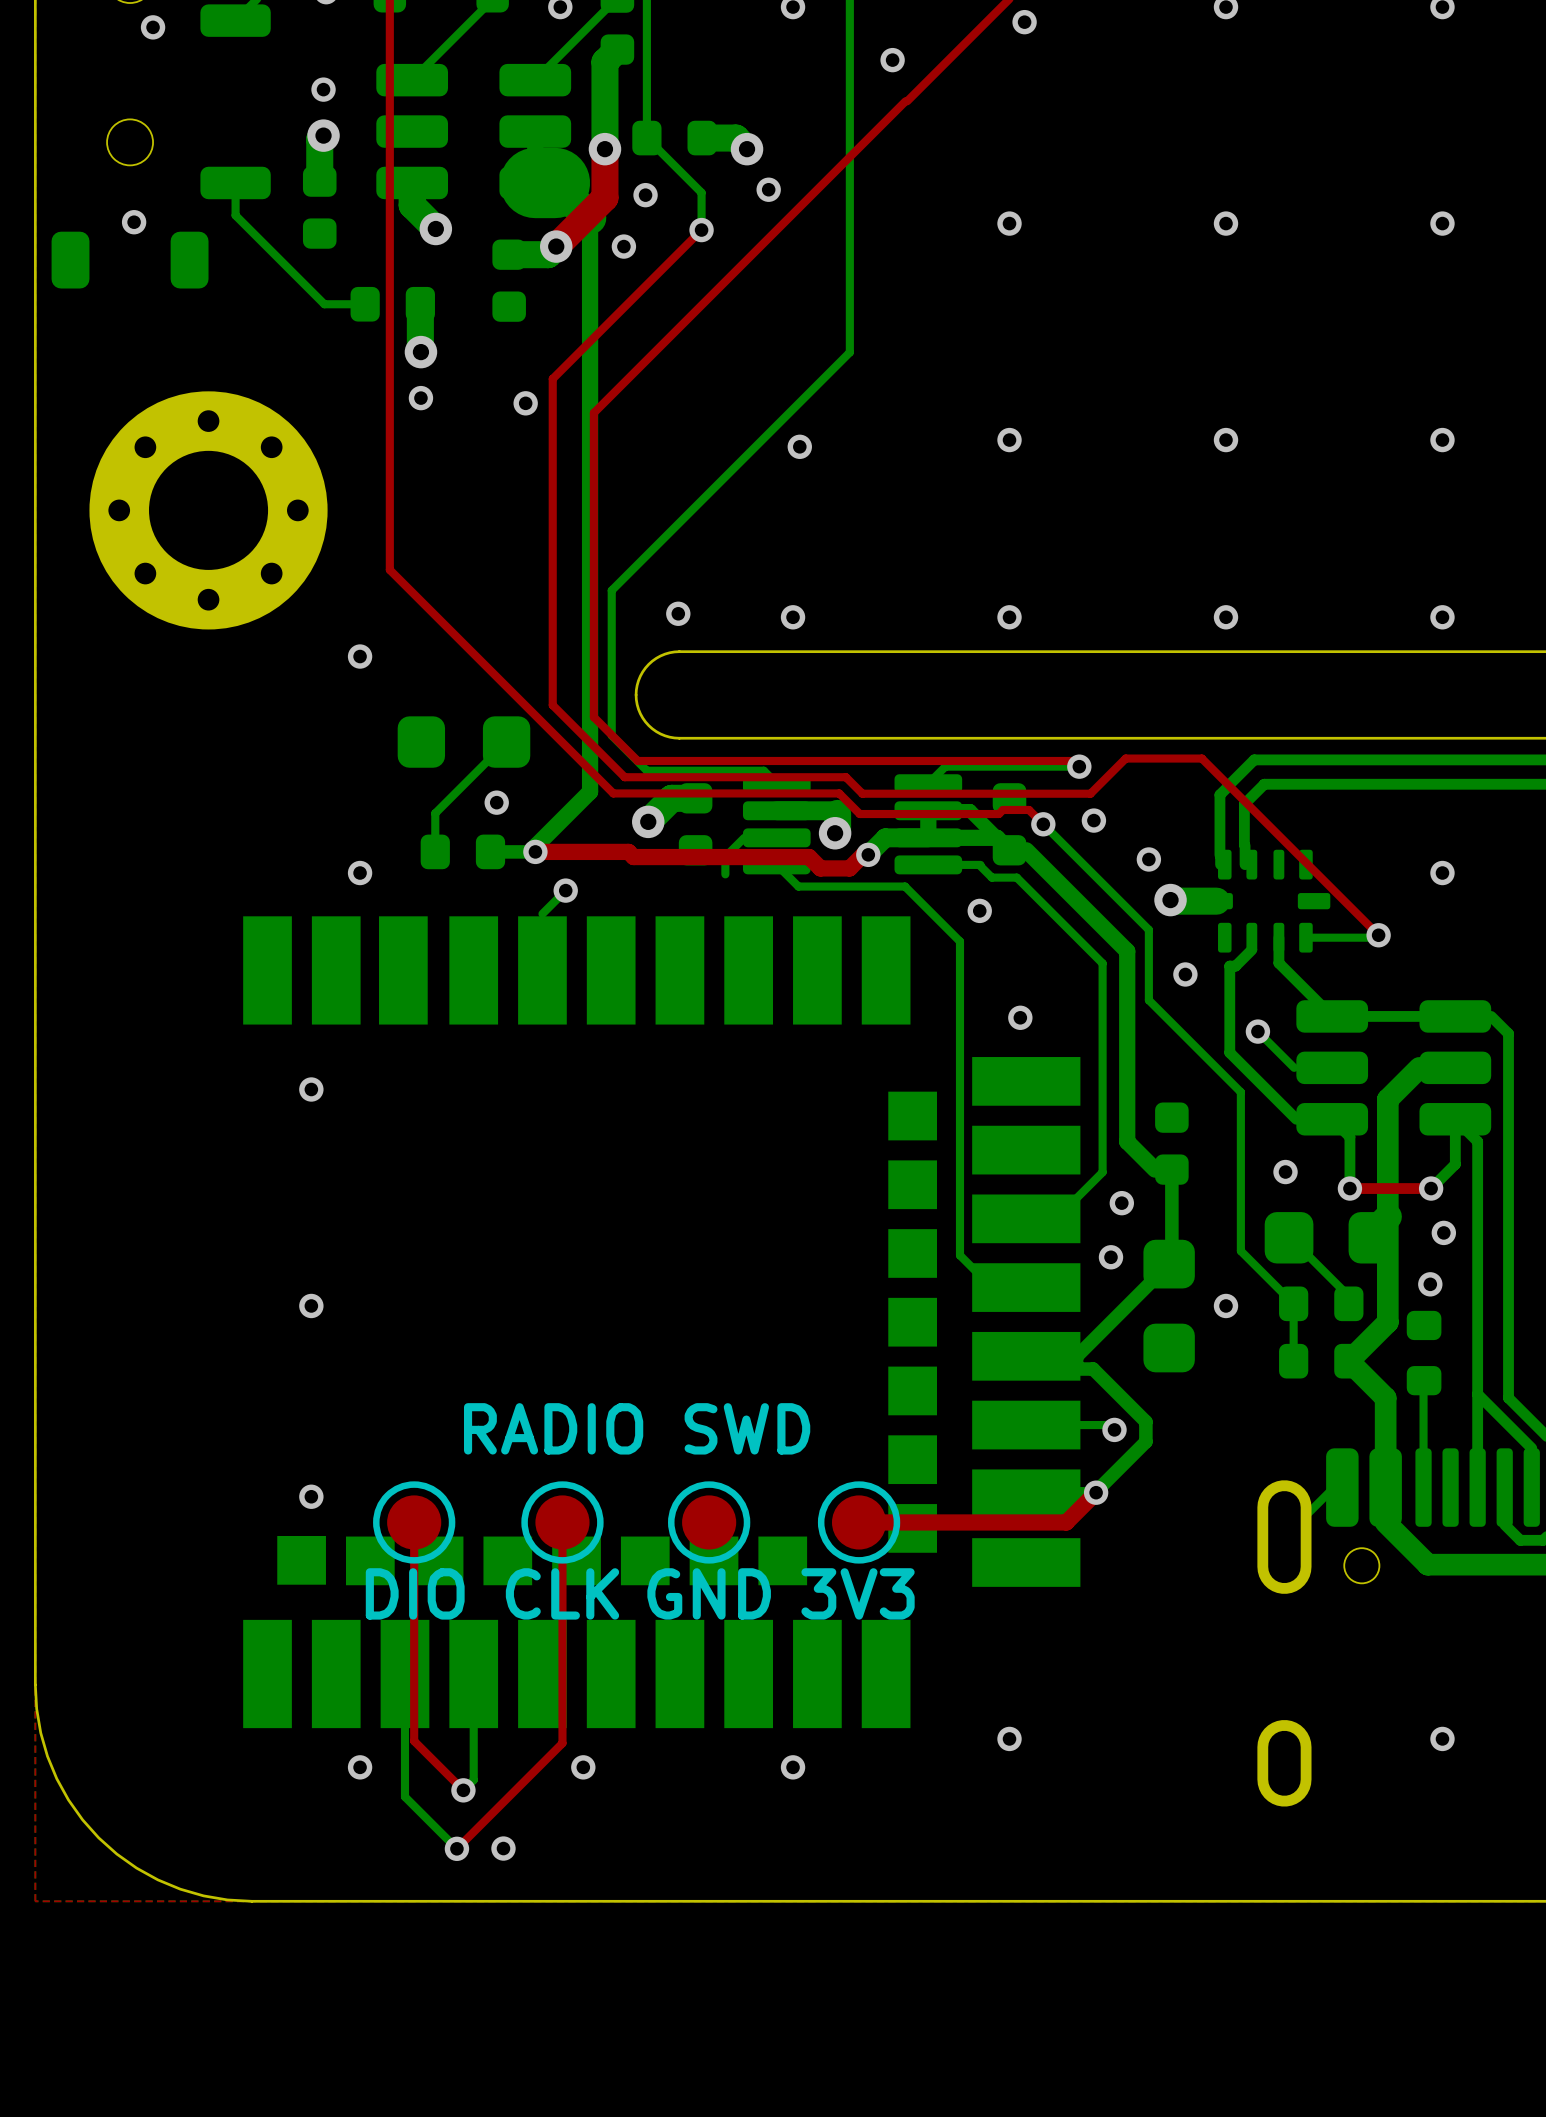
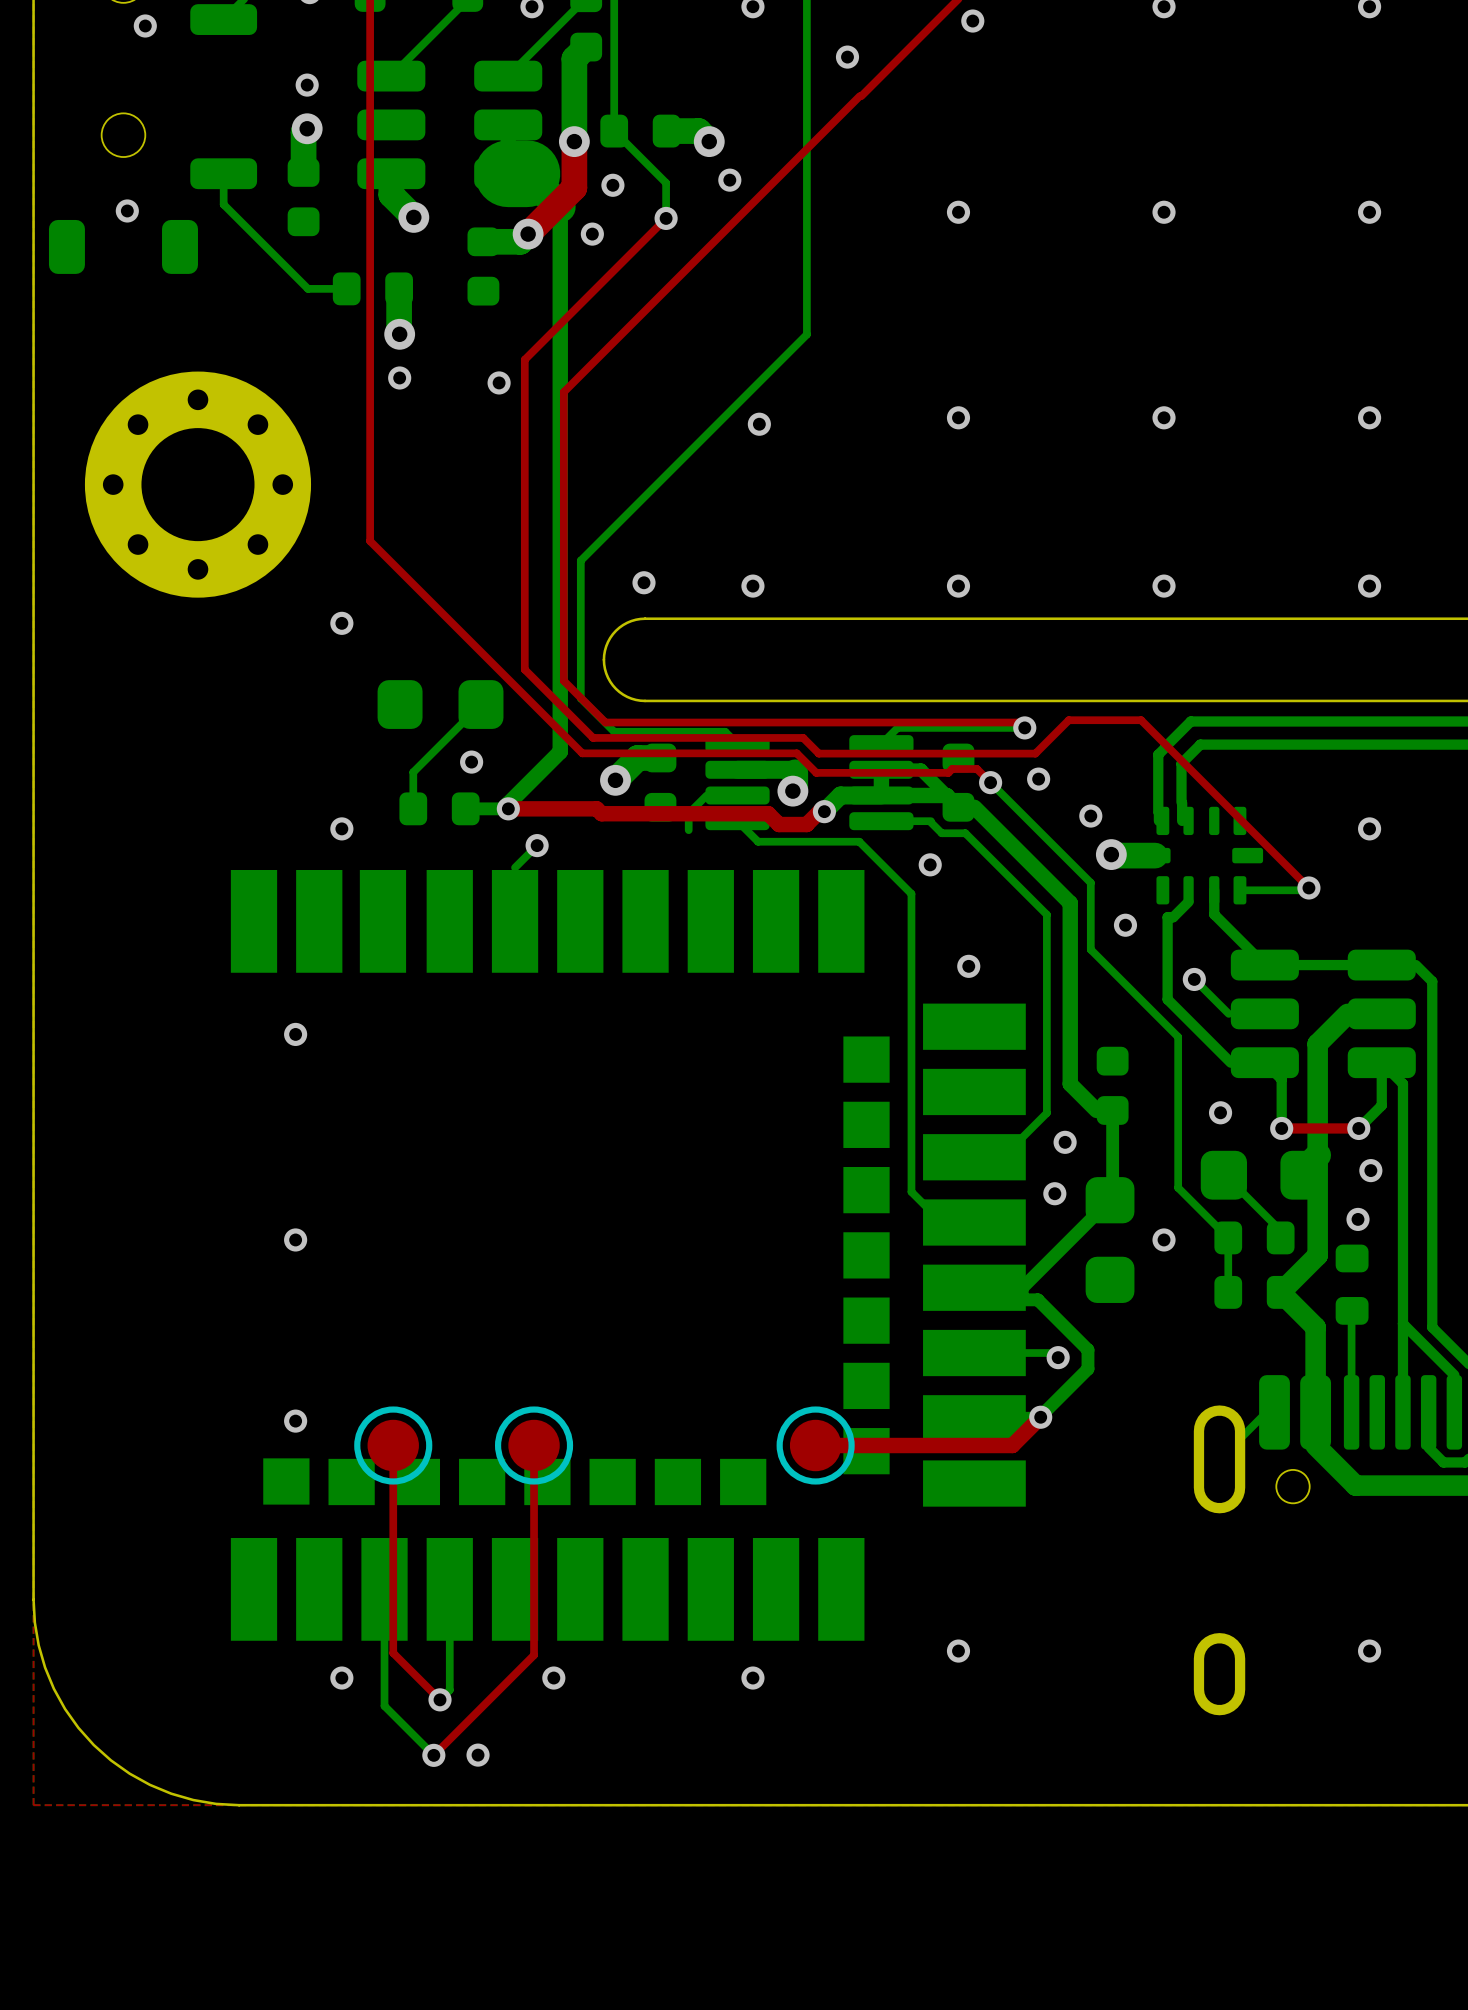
text: RADIO SWD (637, 1428) -> none
part: (709, 1522) -> none
text: DIO (415, 1593) -> none
text: CLK (562, 1593) -> none
text: GND (709, 1593) -> none
text: 3V3 (858, 1593) -> none

